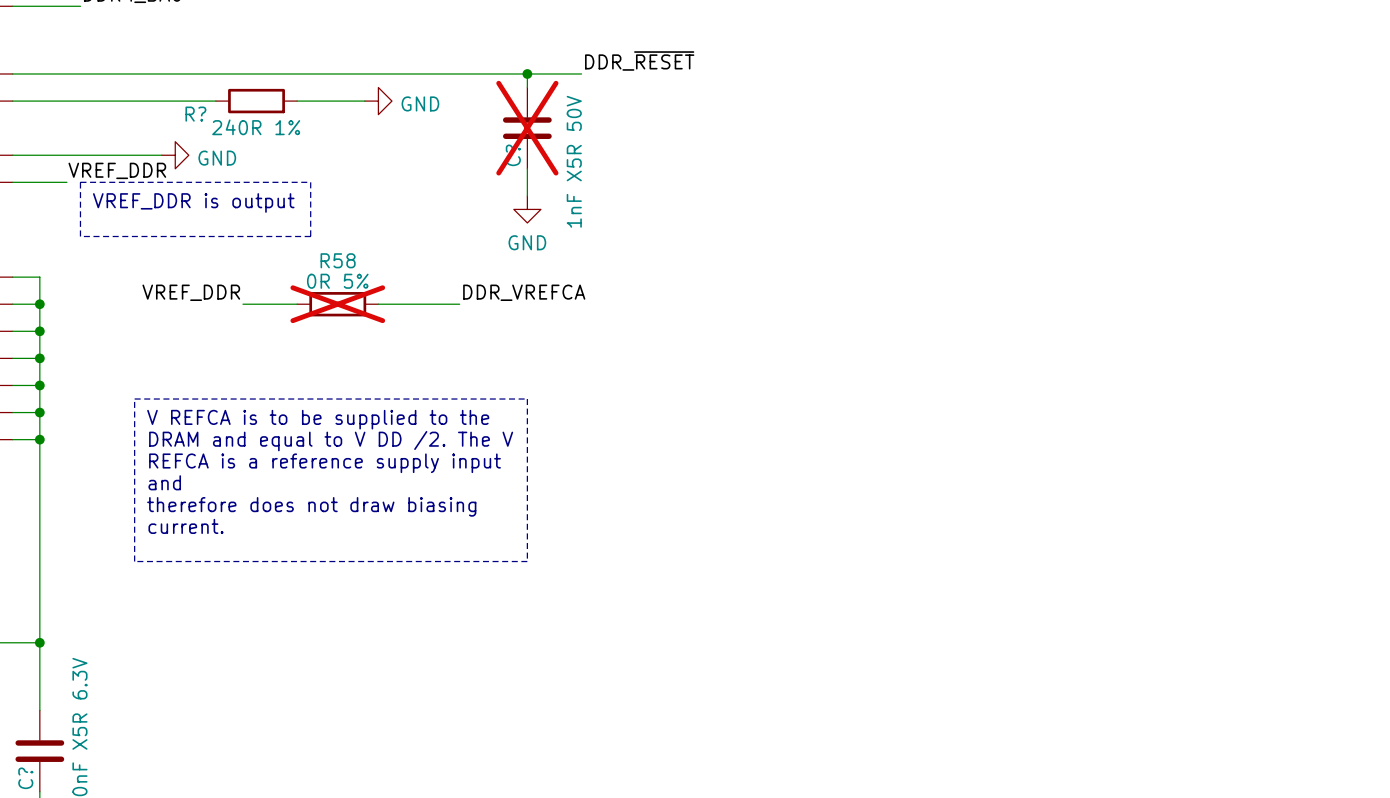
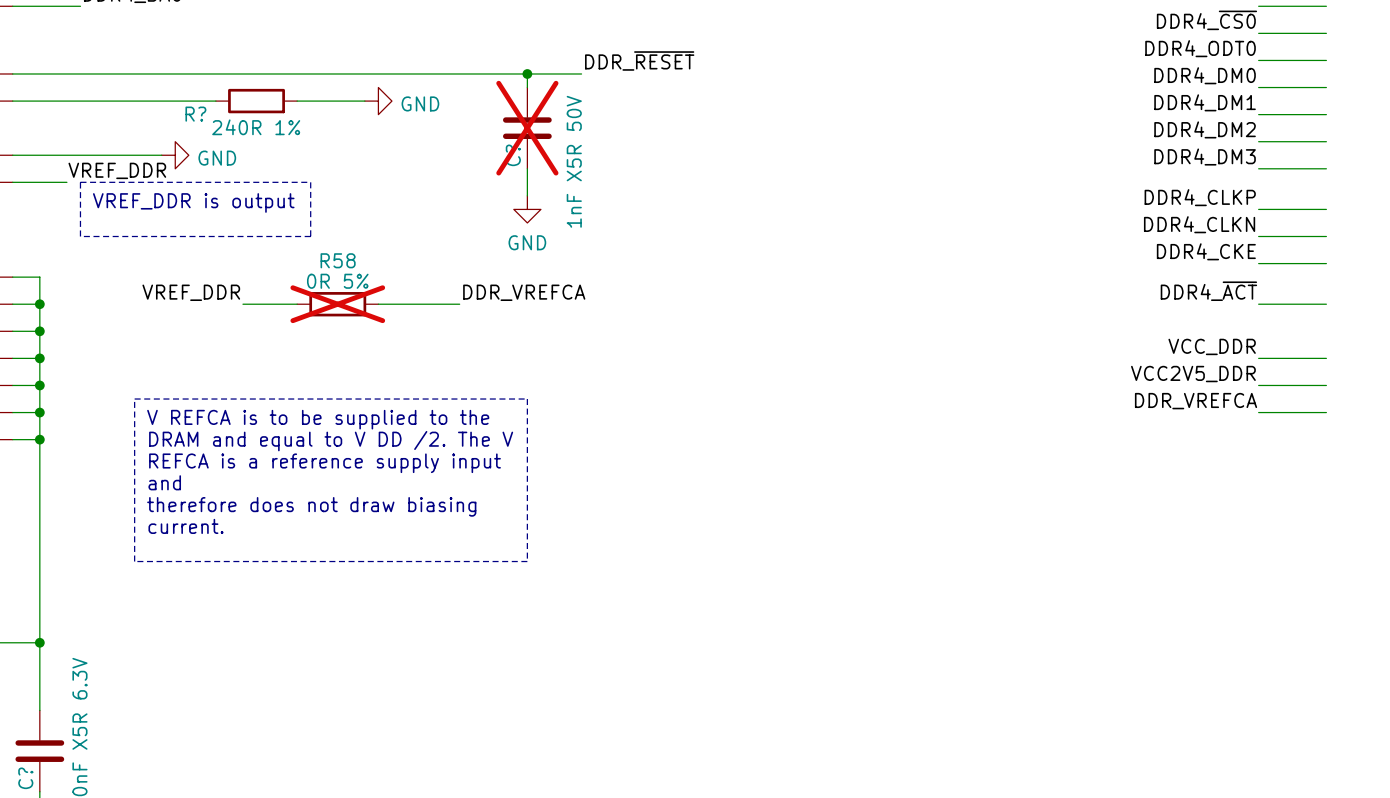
wire: none -> (1258, 6) (1326, 6)
label: none -> DDR4_~{CS0} (1206, 20)
wire: none -> (1258, 33) (1326, 33)
label: none -> DDR4_ODT0 (1200, 48)
wire: none -> (1258, 60) (1326, 60)
label: none -> DDR4_DM0 (1205, 75)
wire: none -> (1258, 87) (1326, 87)
label: none -> DDR4_DM1 (1205, 102)
wire: none -> (1258, 114) (1326, 114)
label: none -> DDR4_DM2 (1205, 129)
wire: none -> (1258, 141) (1326, 141)
label: none -> DDR4_DM3 (1205, 157)
wire: none -> (1258, 168) (1326, 168)
label: none -> DDR4_CLKP (1200, 197)
wire: none -> (1258, 209) (1326, 209)
label: none -> DDR4_CLKN (1199, 224)
wire: none -> (1258, 236) (1326, 236)
label: none -> DDR4_CKE (1206, 251)
wire: none -> (1258, 263) (1326, 263)
label: none -> DDR4_~{ACT} (1208, 291)
wire: none -> (1258, 304) (1326, 304)
label: none -> VCC_DDR (1212, 346)
wire: none -> (1258, 358) (1326, 358)
label: none -> VCC2V5_DDR (1193, 374)
wire: none -> (1258, 385) (1326, 385)
label: none -> DDR_VREFCA (1196, 401)
wire: none -> (1258, 412) (1326, 412)

